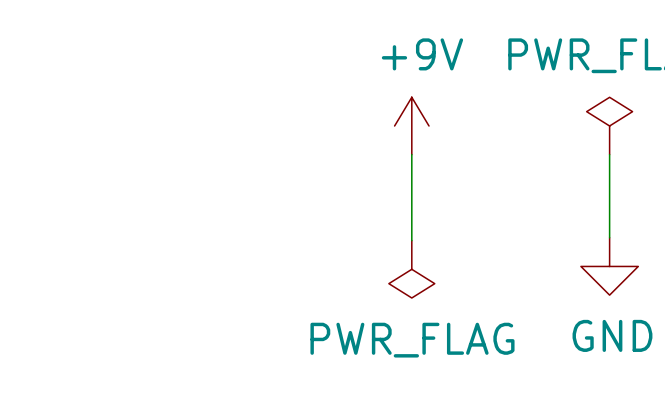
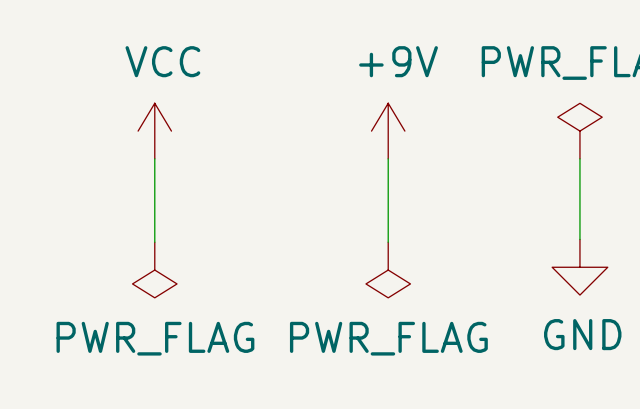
power symbol: none -> VCC (154, 131)
wire: none -> (154, 158) (154, 242)
power symbol: none -> PWR_FLAG (154, 270)

